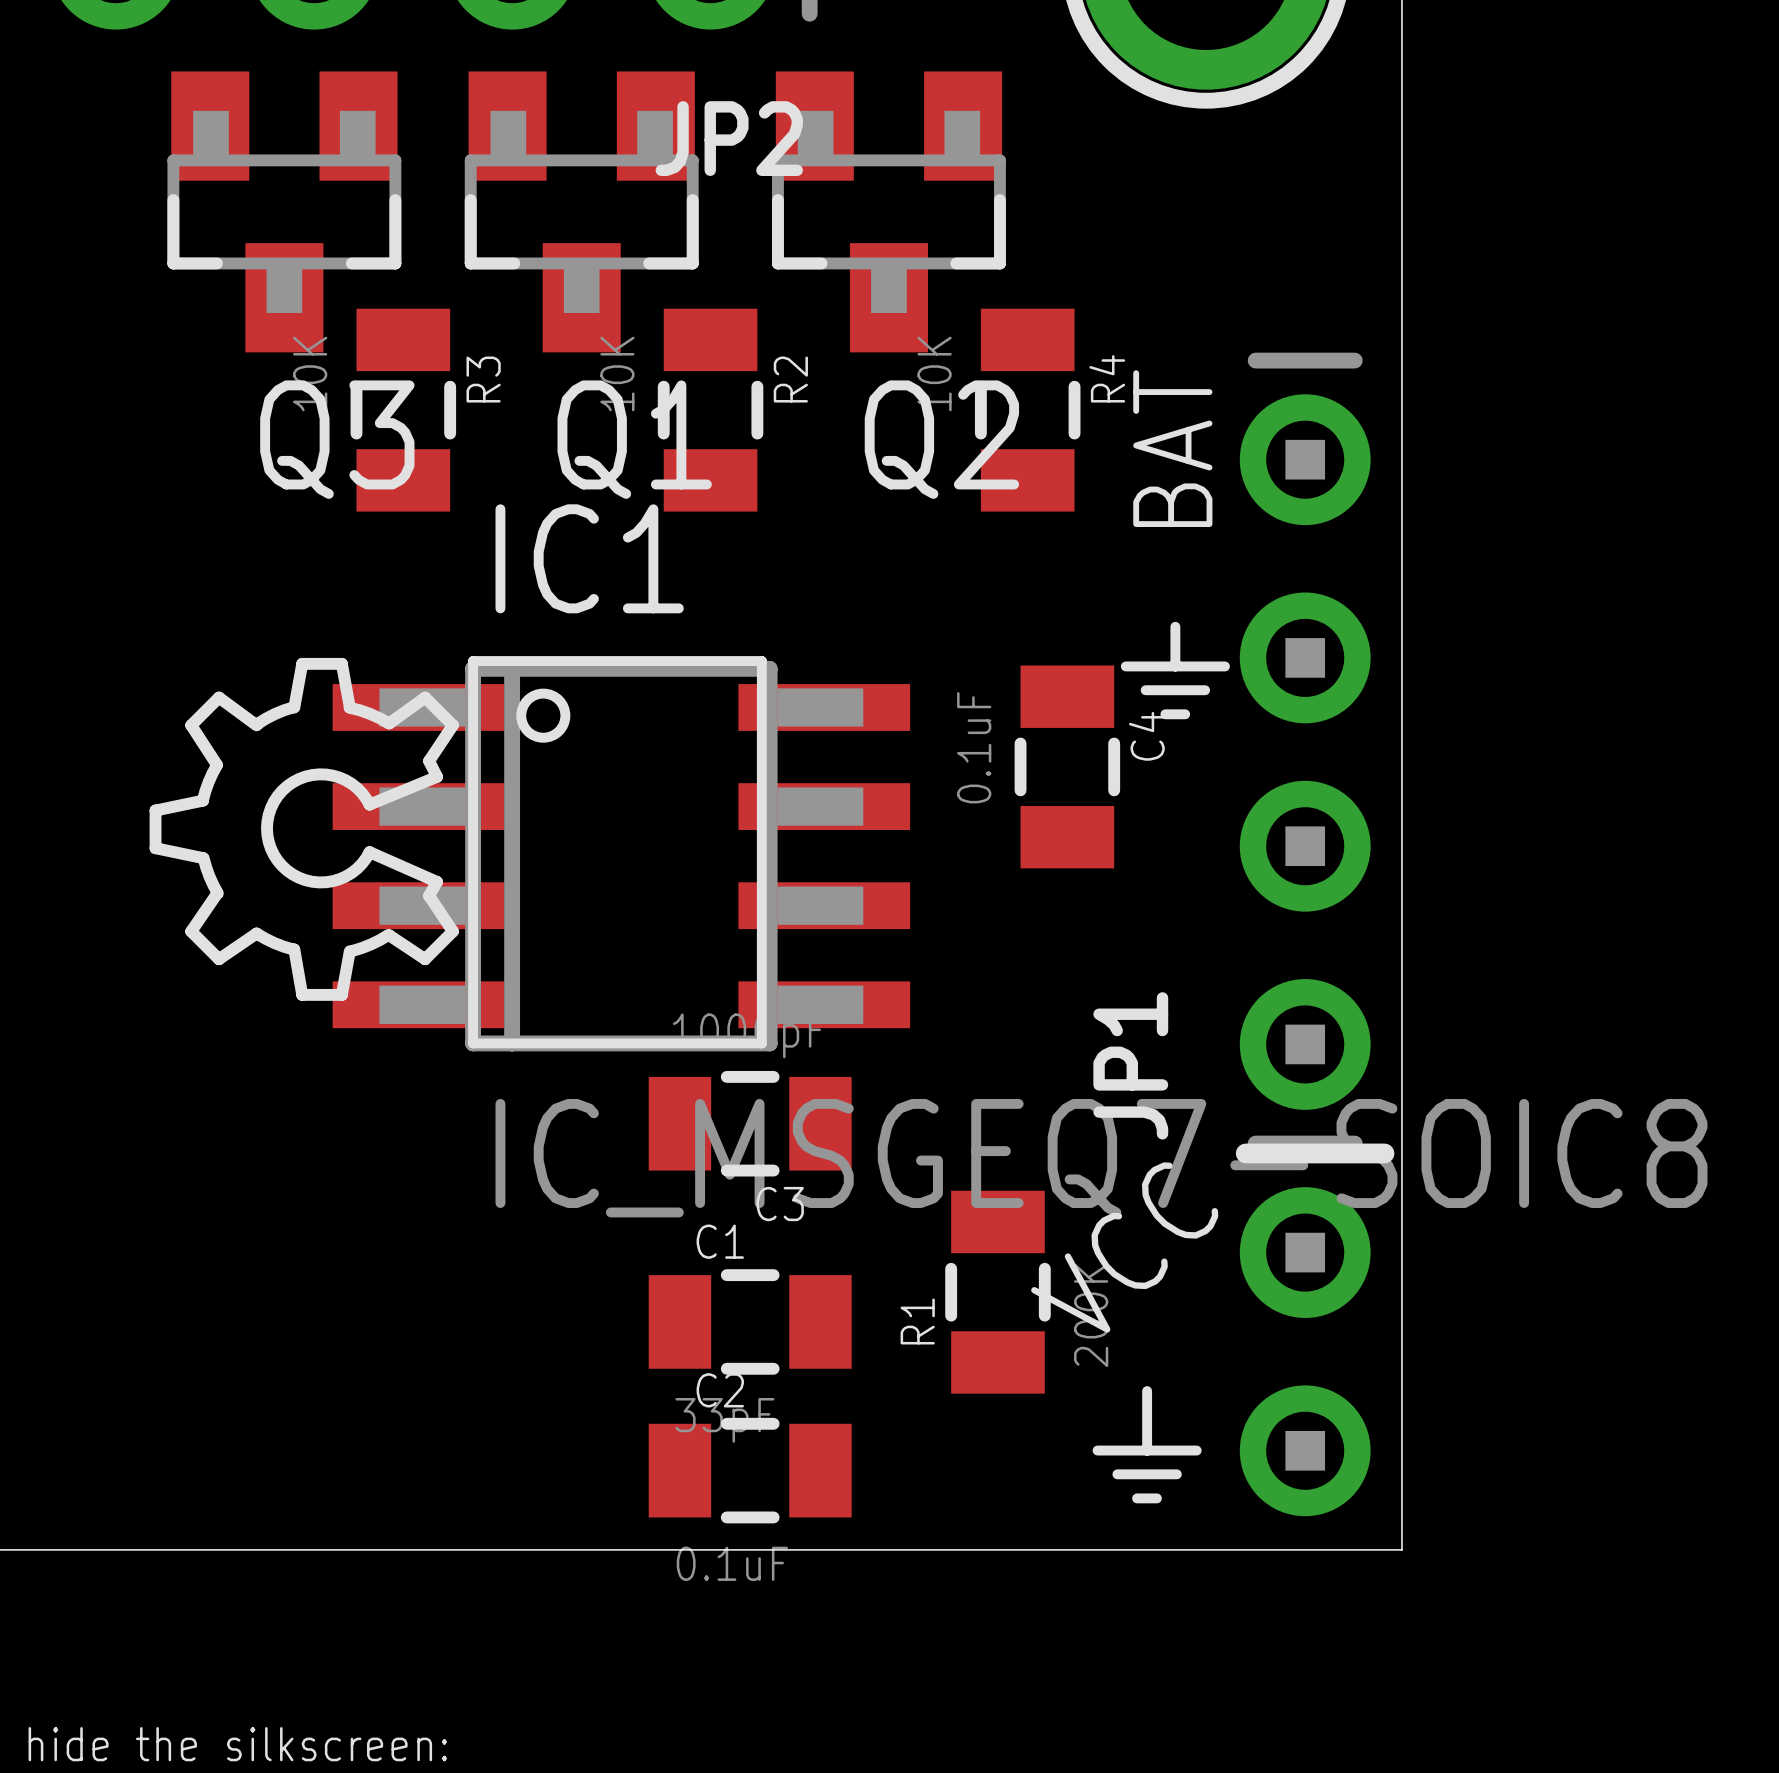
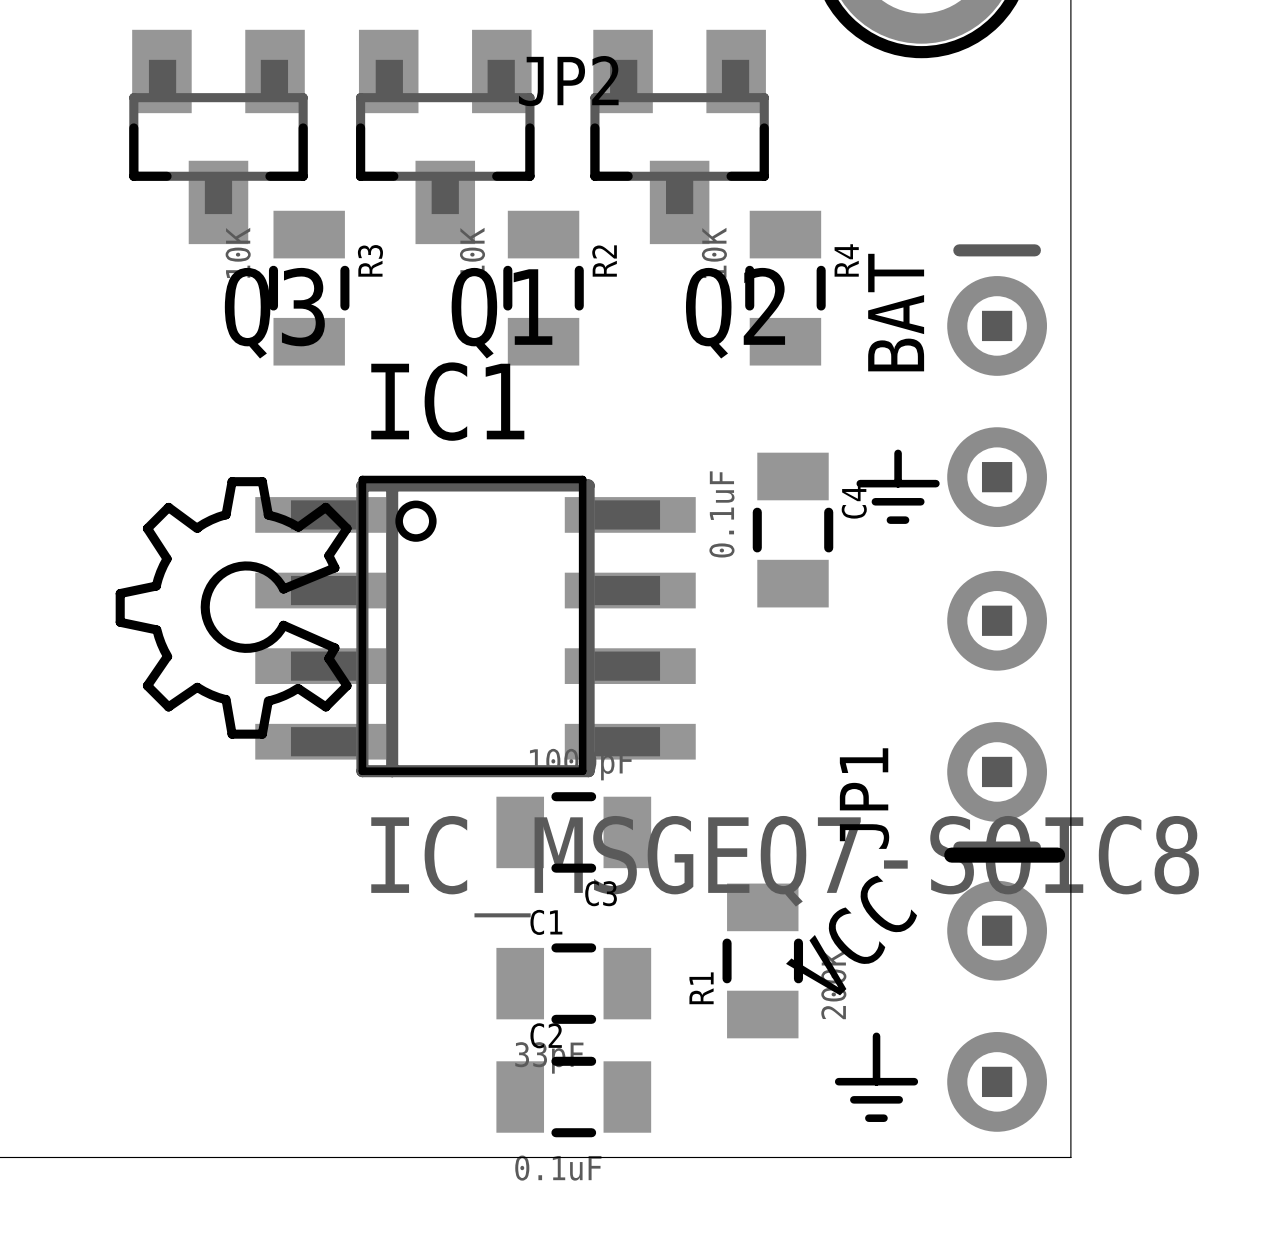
C4 position: (1067, 766) -> (793, 530)

